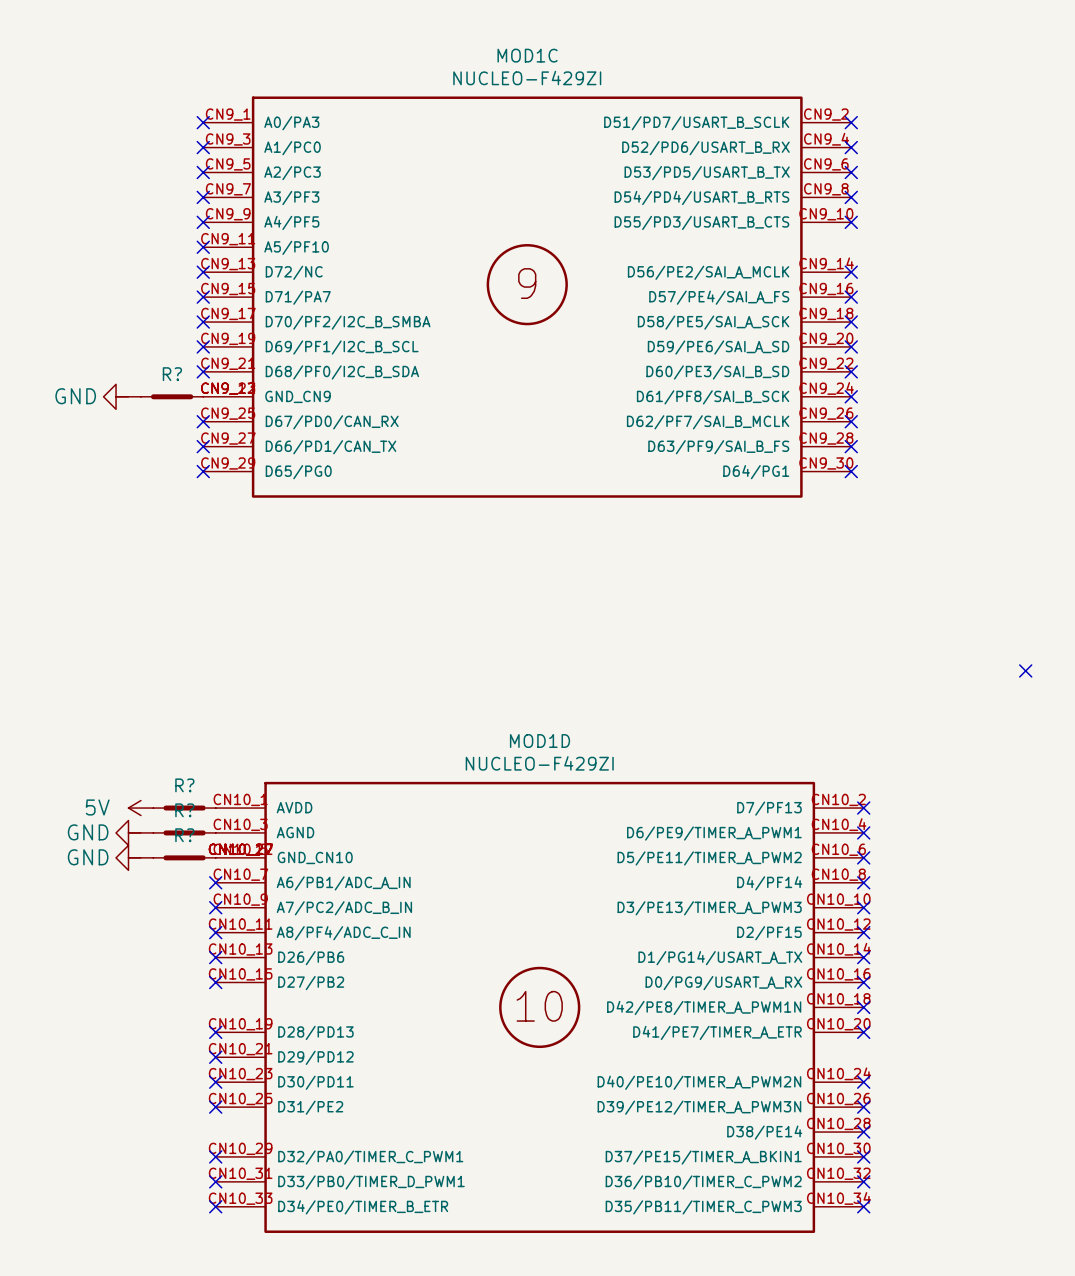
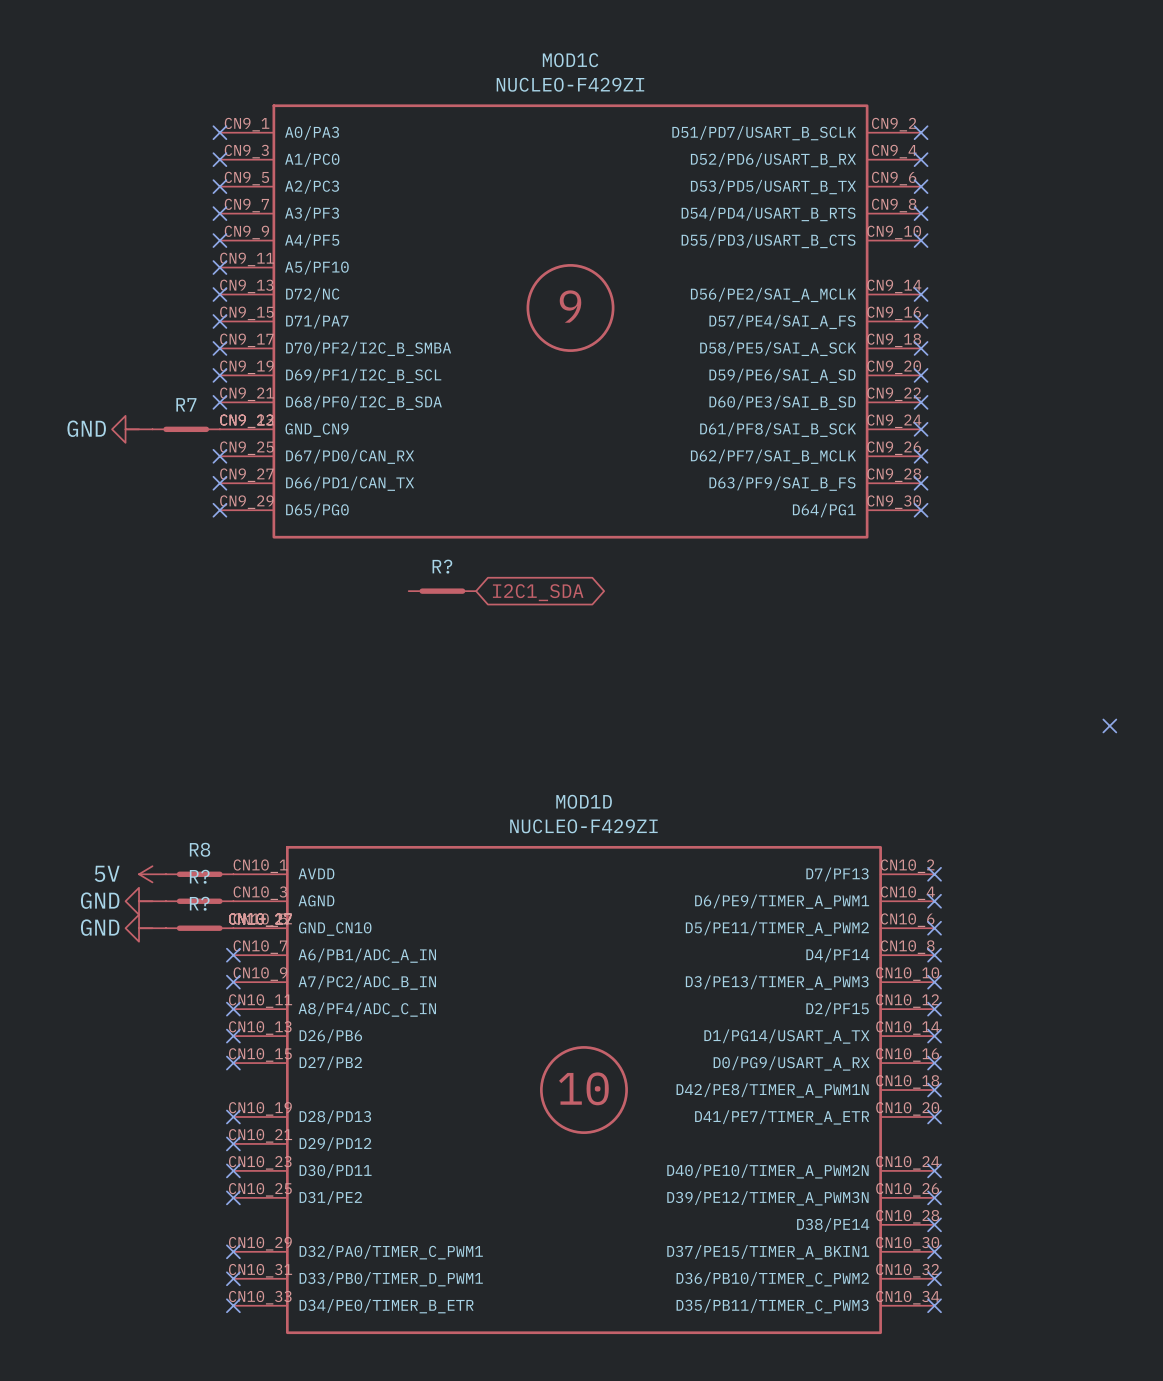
R? name: R? (172, 374) -> R7 (186, 404)
R?: none -> (442, 591)
global label: none -> I2C1_SDA (538, 592)
R? name: R? (184, 785) -> R8 (200, 849)

